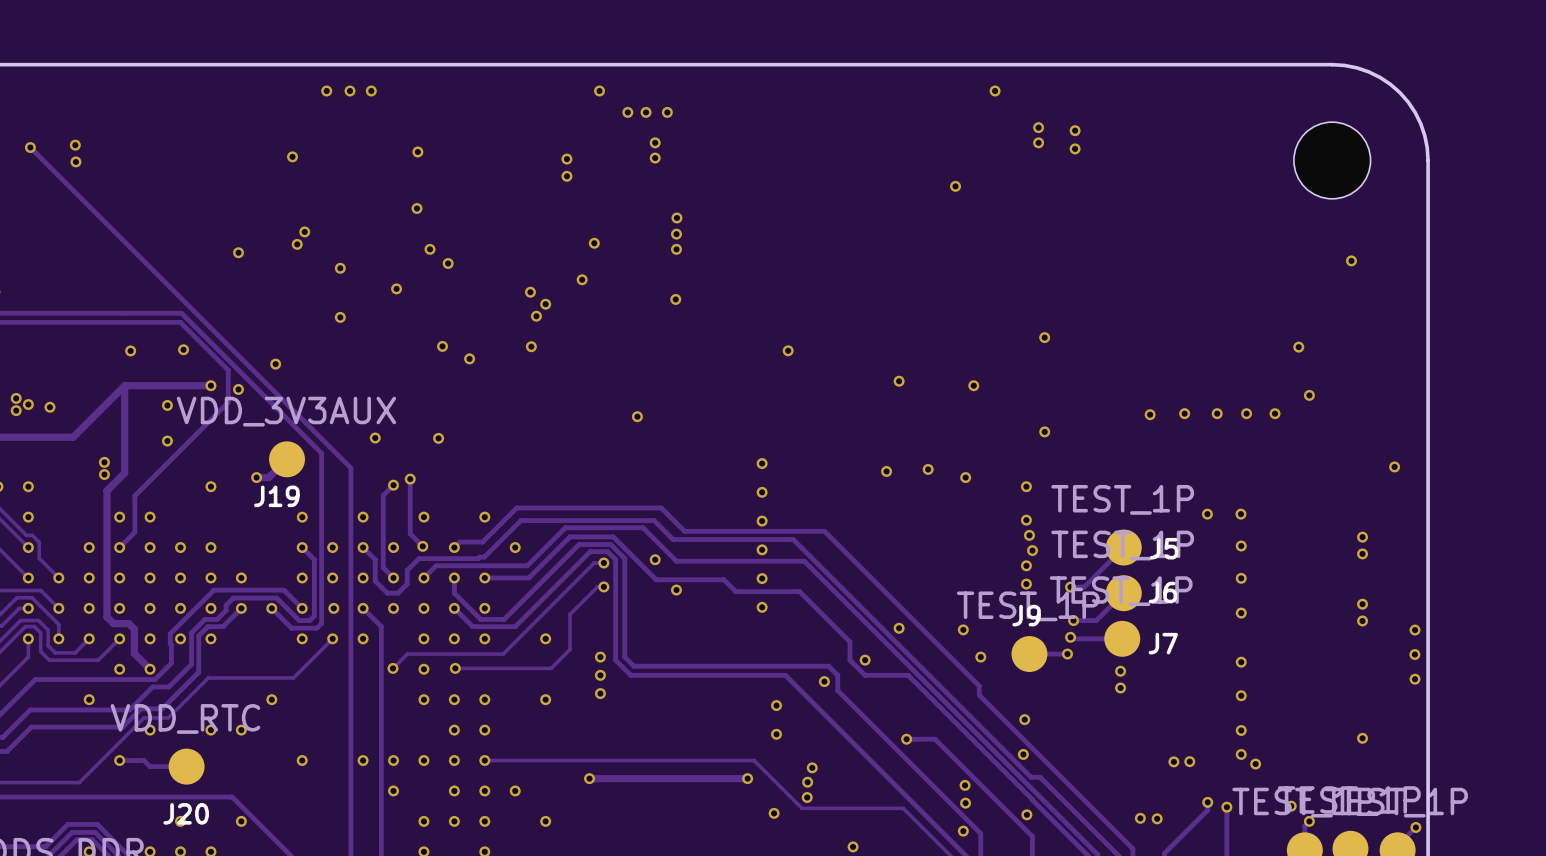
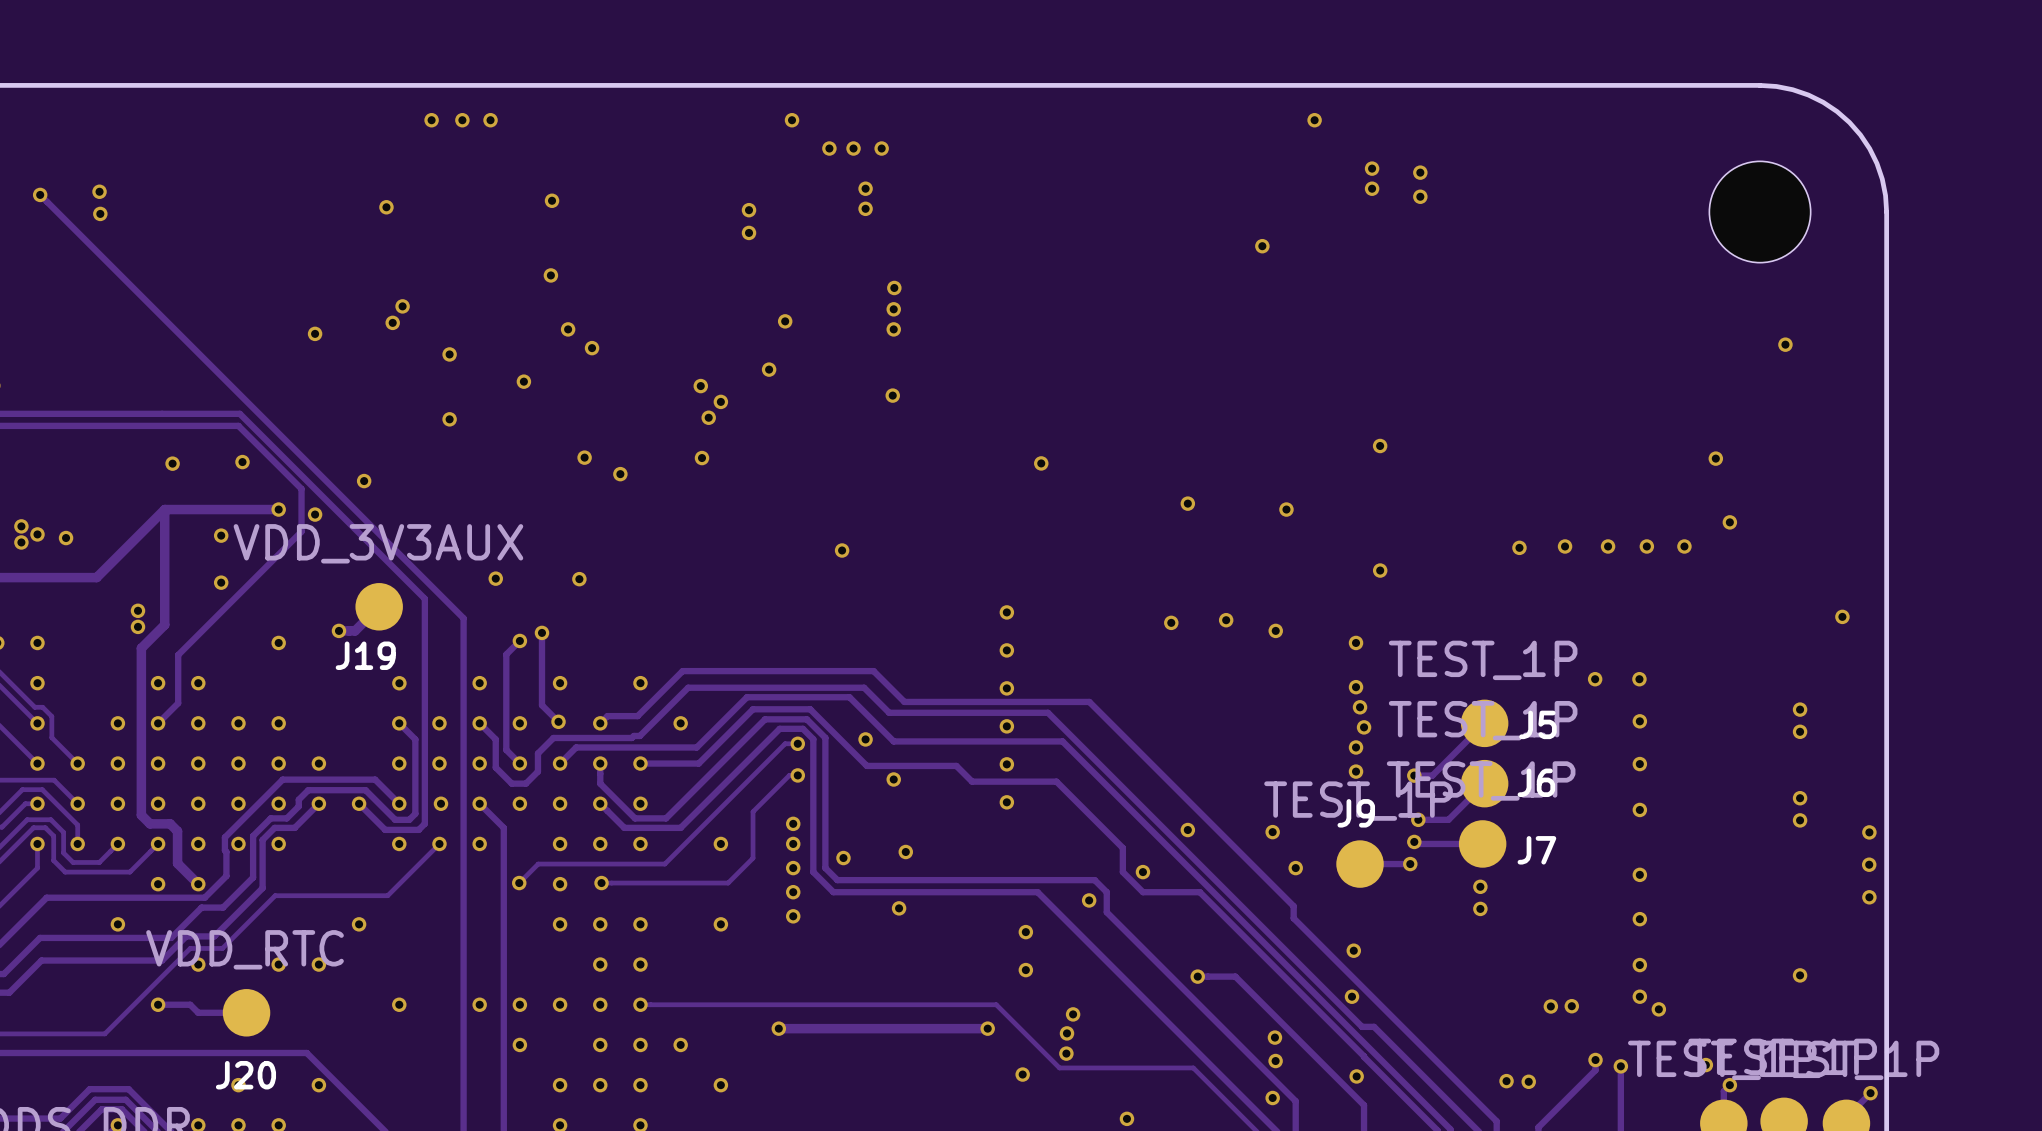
via: none -> (793, 823)
via: none -> (793, 843)
via: none -> (905, 851)
via: none -> (843, 858)
via: none -> (899, 908)

